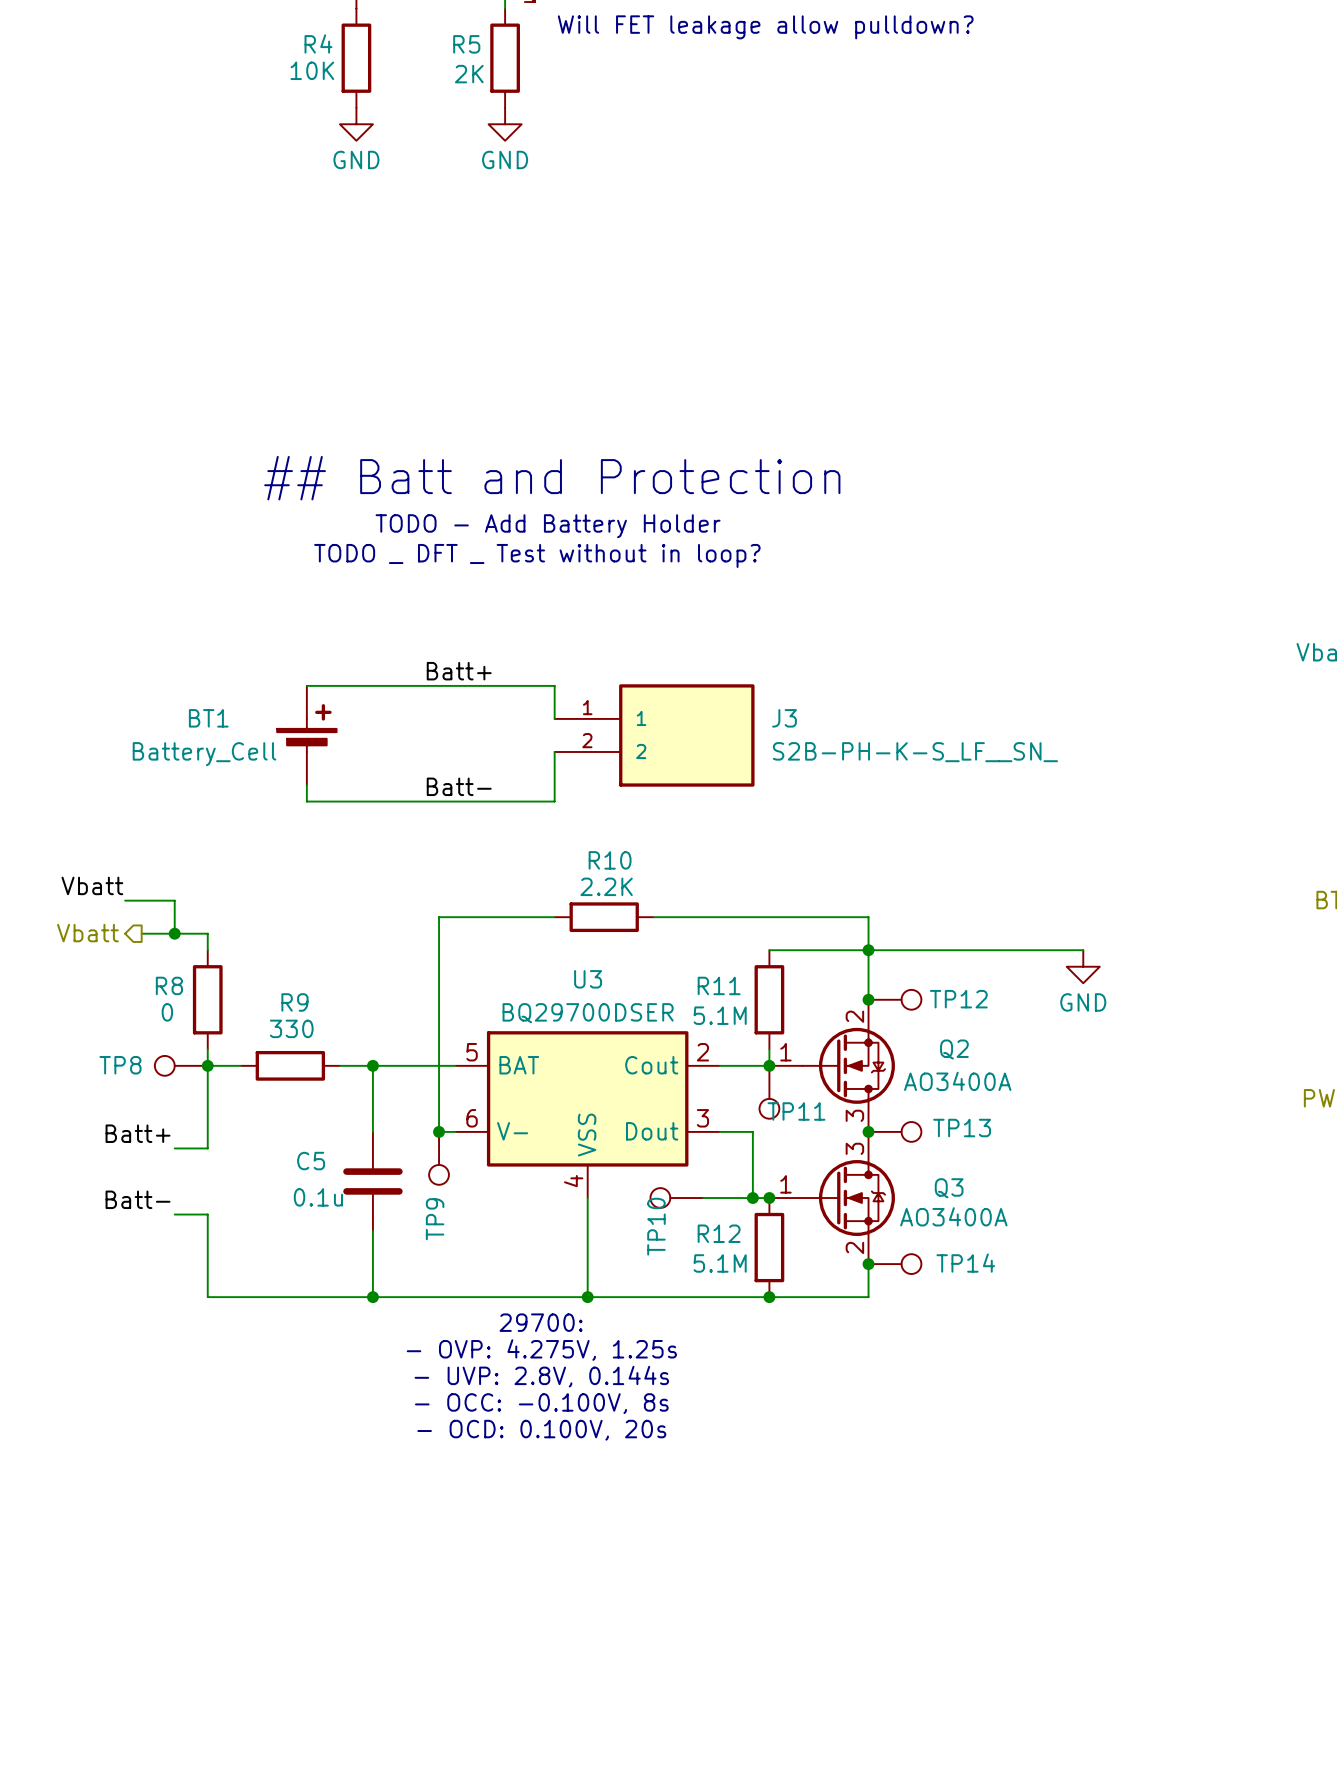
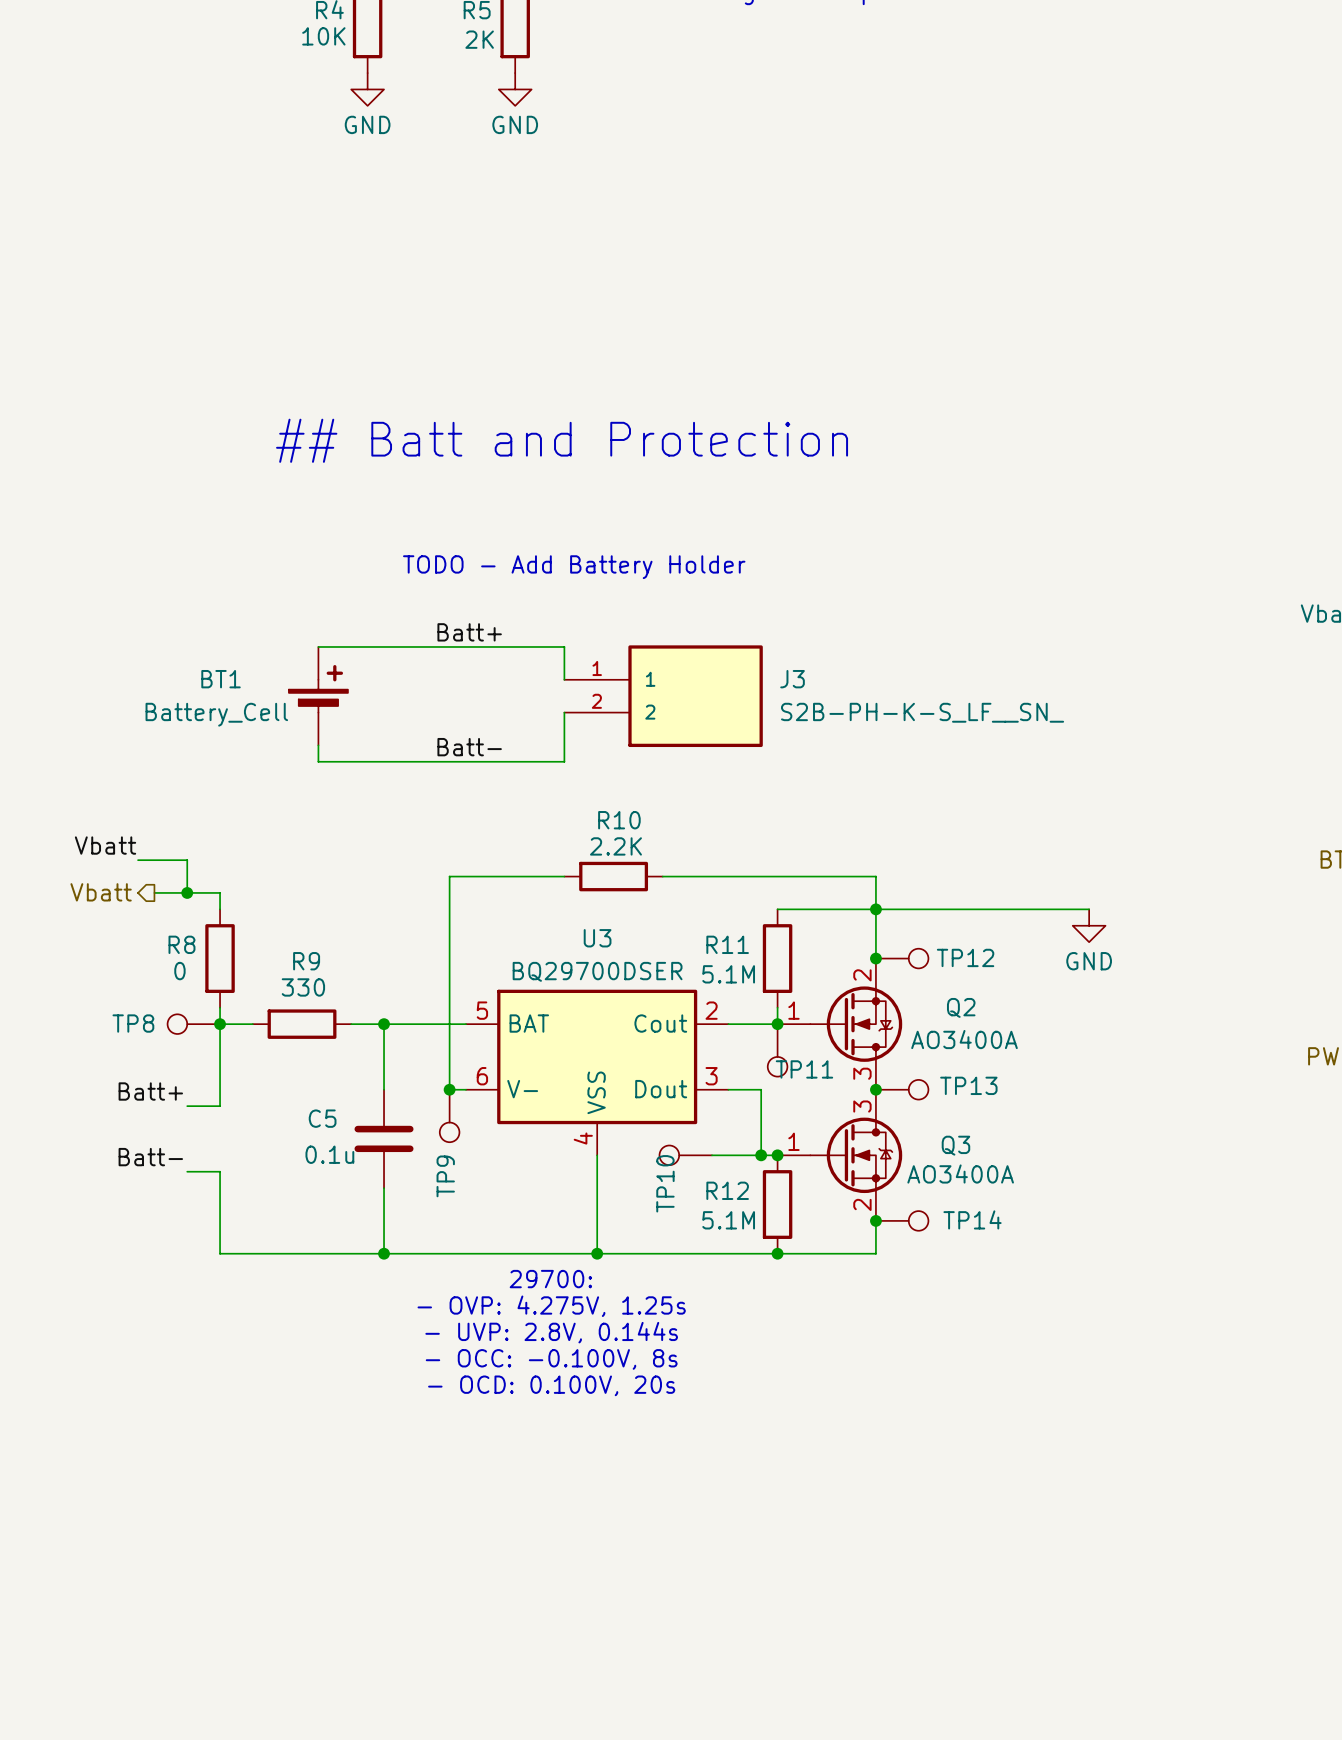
text position: TODO - Add Battery Holder (548, 526) -> TODO - Add Battery Holder (574, 567)
text: TODO _ DFT _ Test without in loop? (537, 555) -> none

